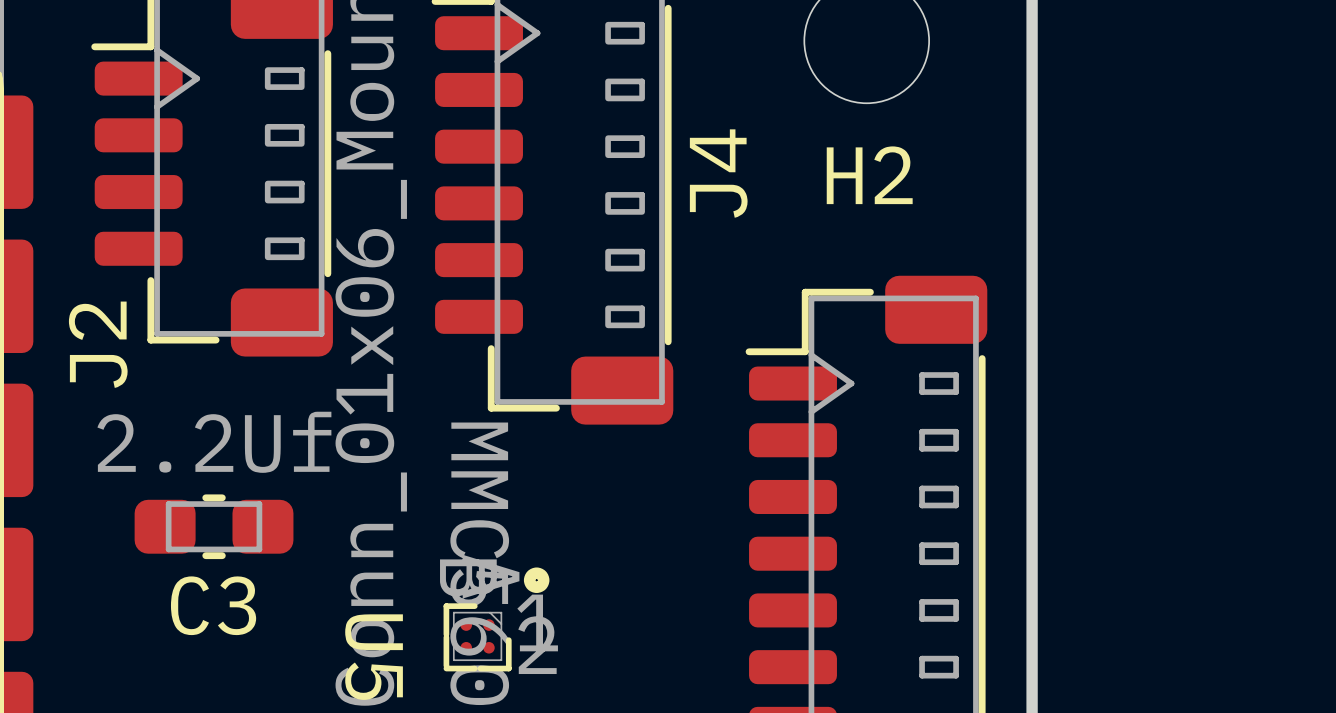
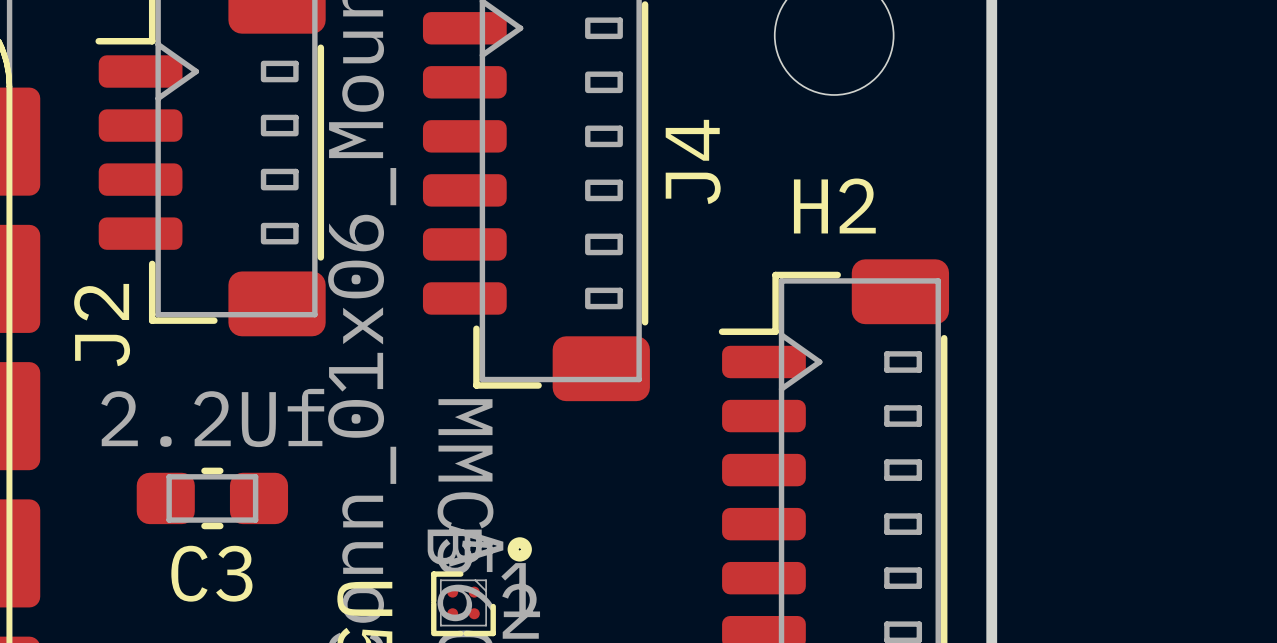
H2 name position: H2 (869, 175) -> H2 (834, 205)

